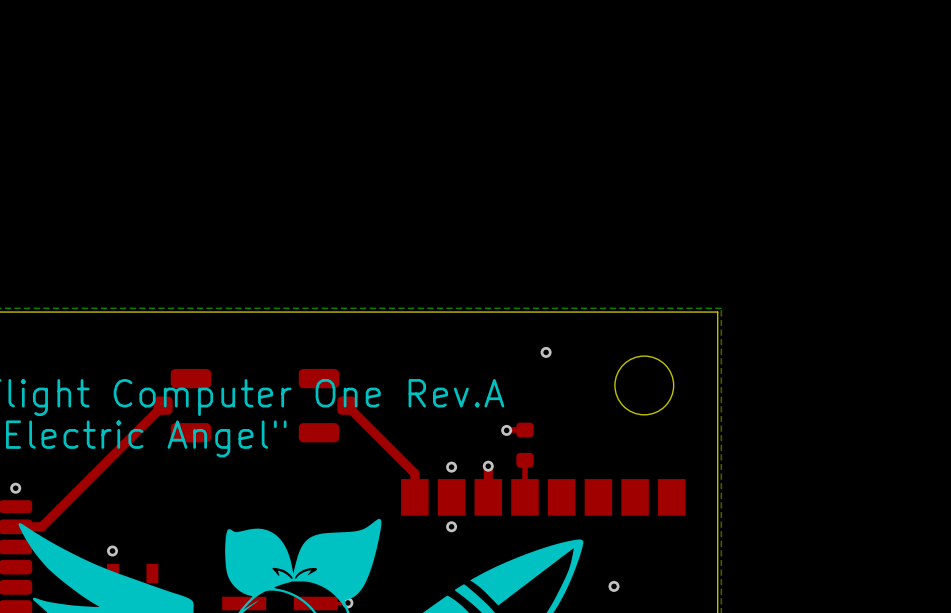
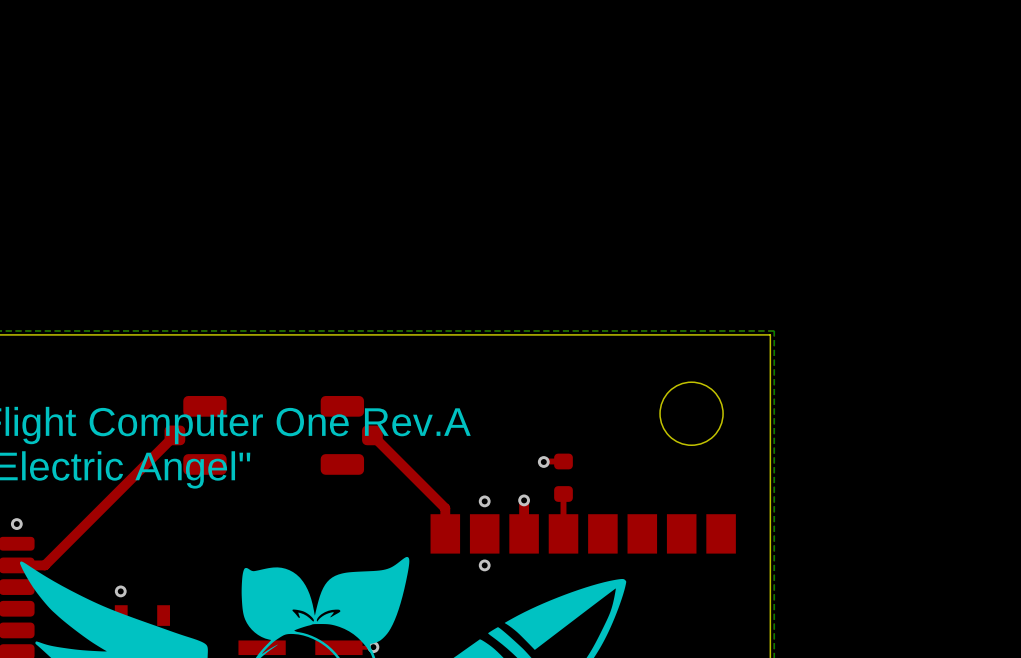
via: (546, 352) -> none
via: (614, 586) -> none

